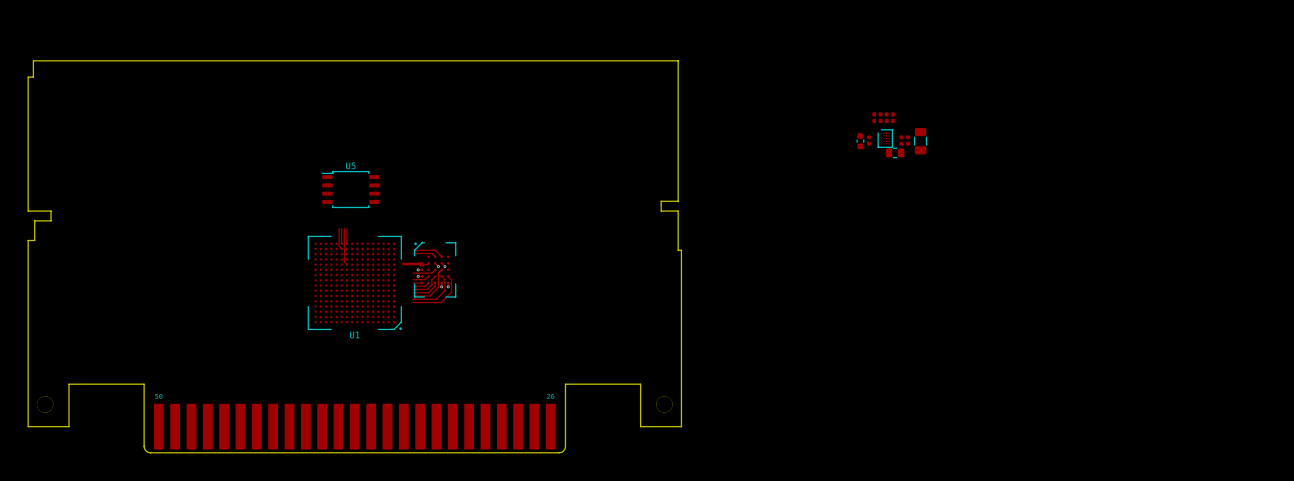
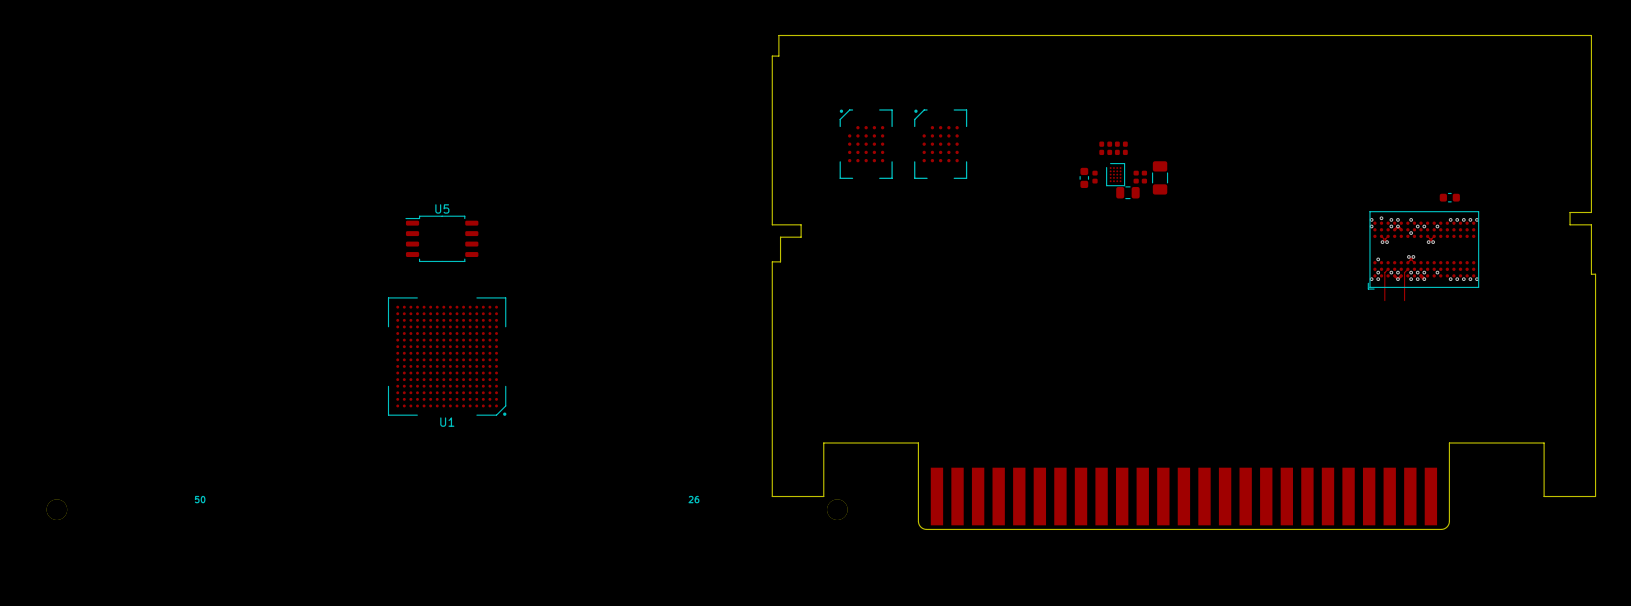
board edge: none -> (778, 35) (778, 56) (772, 56) (772, 224) (801, 224) (801, 237) (780, 237) (780, 261) (772, 261) (772, 496) (823, 496) (823, 443) (918, 443) (918, 522) (920, 527) (925, 529) (1442, 529) (1447, 527) (1449, 522) (1449, 443) (1544, 443) (1544, 496) (1595, 496) (1595, 274) (1591, 274) (1591, 224) (1570, 224) (1570, 212) (1591, 212) (1591, 35) (778, 35)
board edge: (33, 60) (33, 77) (28, 77) (28, 211) (51, 211) (51, 220) (34, 220) (34, 240) (28, 240) (28, 426) (68, 426) (68, 384) (144, 384) (144, 447) (149, 452) (559, 452) (565, 447) (565, 384) (640, 384) (640, 426) (681, 426) (681, 250) (678, 250) (678, 211) (661, 211) (661, 201) (678, 201) (678, 60) (33, 60) -> none
part: none -> (866, 144)
part: none -> (940, 144)
part: none -> (1449, 197)
via: none -> (1381, 218)
via: none -> (1371, 219)
via: none -> (1391, 219)
via: none -> (1397, 219)
via: none -> (1411, 219)
via: none -> (1450, 219)
via: none -> (1457, 219)
via: none -> (1463, 219)
via: none -> (1470, 219)
via: none -> (1477, 219)
via: none -> (1371, 226)
via: none -> (1391, 226)
via: none -> (1397, 226)
via: none -> (1417, 226)
via: none -> (1424, 226)
via: none -> (1437, 226)
track: none -> (1394, 229) (1397, 226) (1401, 229)
via: none -> (1411, 233)
track: none -> (1381, 236) (1383, 238) (1382, 242)
track: none -> (1388, 236) (1385, 238) (1387, 242)
track: none -> (1427, 236) (1430, 238) (1428, 242)
track: none -> (1434, 236) (1431, 238) (1433, 242)
via: none -> (1382, 242)
via: none -> (1387, 242)
via: none -> (1428, 242)
via: none -> (1433, 242)
part: none -> (1423, 250)
track: none -> (1408, 256) (1410, 260) (1407, 262)
via: none -> (1408, 256)
track: none -> (1413, 256) (1411, 260) (1414, 262)
via: none -> (1413, 256)
via: none -> (1378, 259)
track: none -> (1388, 269) (1384, 272) (1384, 300)
track: none -> (1407, 269) (1404, 272) (1404, 300)
via: none -> (1378, 272)
via: none -> (1391, 272)
via: none -> (1397, 272)
via: none -> (1411, 272)
via: none -> (1417, 272)
via: none -> (1424, 272)
via: none -> (1437, 272)
track: none -> (1394, 275) (1397, 279) (1401, 275)
track: none -> (1421, 275) (1424, 279)
via: none -> (1371, 279)
via: none -> (1378, 279)
via: none -> (1397, 279)
via: none -> (1411, 279)
via: none -> (1417, 279)
via: none -> (1424, 279)
via: none -> (1450, 279)
via: none -> (1457, 279)
via: none -> (1463, 279)
via: none -> (1470, 279)
via: none -> (1477, 279)
track: (339, 228) (339, 246) (341, 248) -> none
track: (341, 228) (341, 243) -> none
track: (344, 228) (344, 262) (346, 264) -> none
track: (346, 228) (346, 243) -> none
track: (412, 250) (435, 250) (441, 256) -> none
track: (412, 253) (431, 253) (435, 256) -> none
track: (402, 263) (422, 263) -> none
track: (428, 263) (423, 265) (402, 264) -> none
track: (435, 263) (438, 266) -> none
track: (441, 263) (444, 266) -> none
via: (438, 266) -> none
via: (444, 266) -> none
track: (418, 269) (422, 269) -> none
via: (418, 269) -> none
track: (435, 269) (431, 273) (412, 273) -> none
part: (435, 269) -> none
track: (441, 269) (438, 273) (438, 287) (429, 296) (412, 296) -> none
track: (418, 276) (422, 276) -> none
via: (418, 276) -> none
track: (428, 276) (425, 279) (412, 279) -> none
track: (435, 276) (431, 279) (431, 284) (427, 289) (412, 289) -> none
track: (441, 276) (444, 279) (444, 290) (436, 299) (412, 299) -> none
track: (448, 276) (451, 279) (451, 292) (441, 302) (412, 302) -> none
track: (412, 282) (422, 282) -> none
track: (428, 282) (425, 286) (412, 286) -> none
track: (435, 282) (435, 286) (428, 292) (412, 292) -> none
track: (441, 282) (441, 286) -> none
track: (448, 282) (448, 286) -> none
via: (441, 286) -> none
via: (448, 286) -> none
part: none -> (1183, 496)
part: (354, 426) -> none

